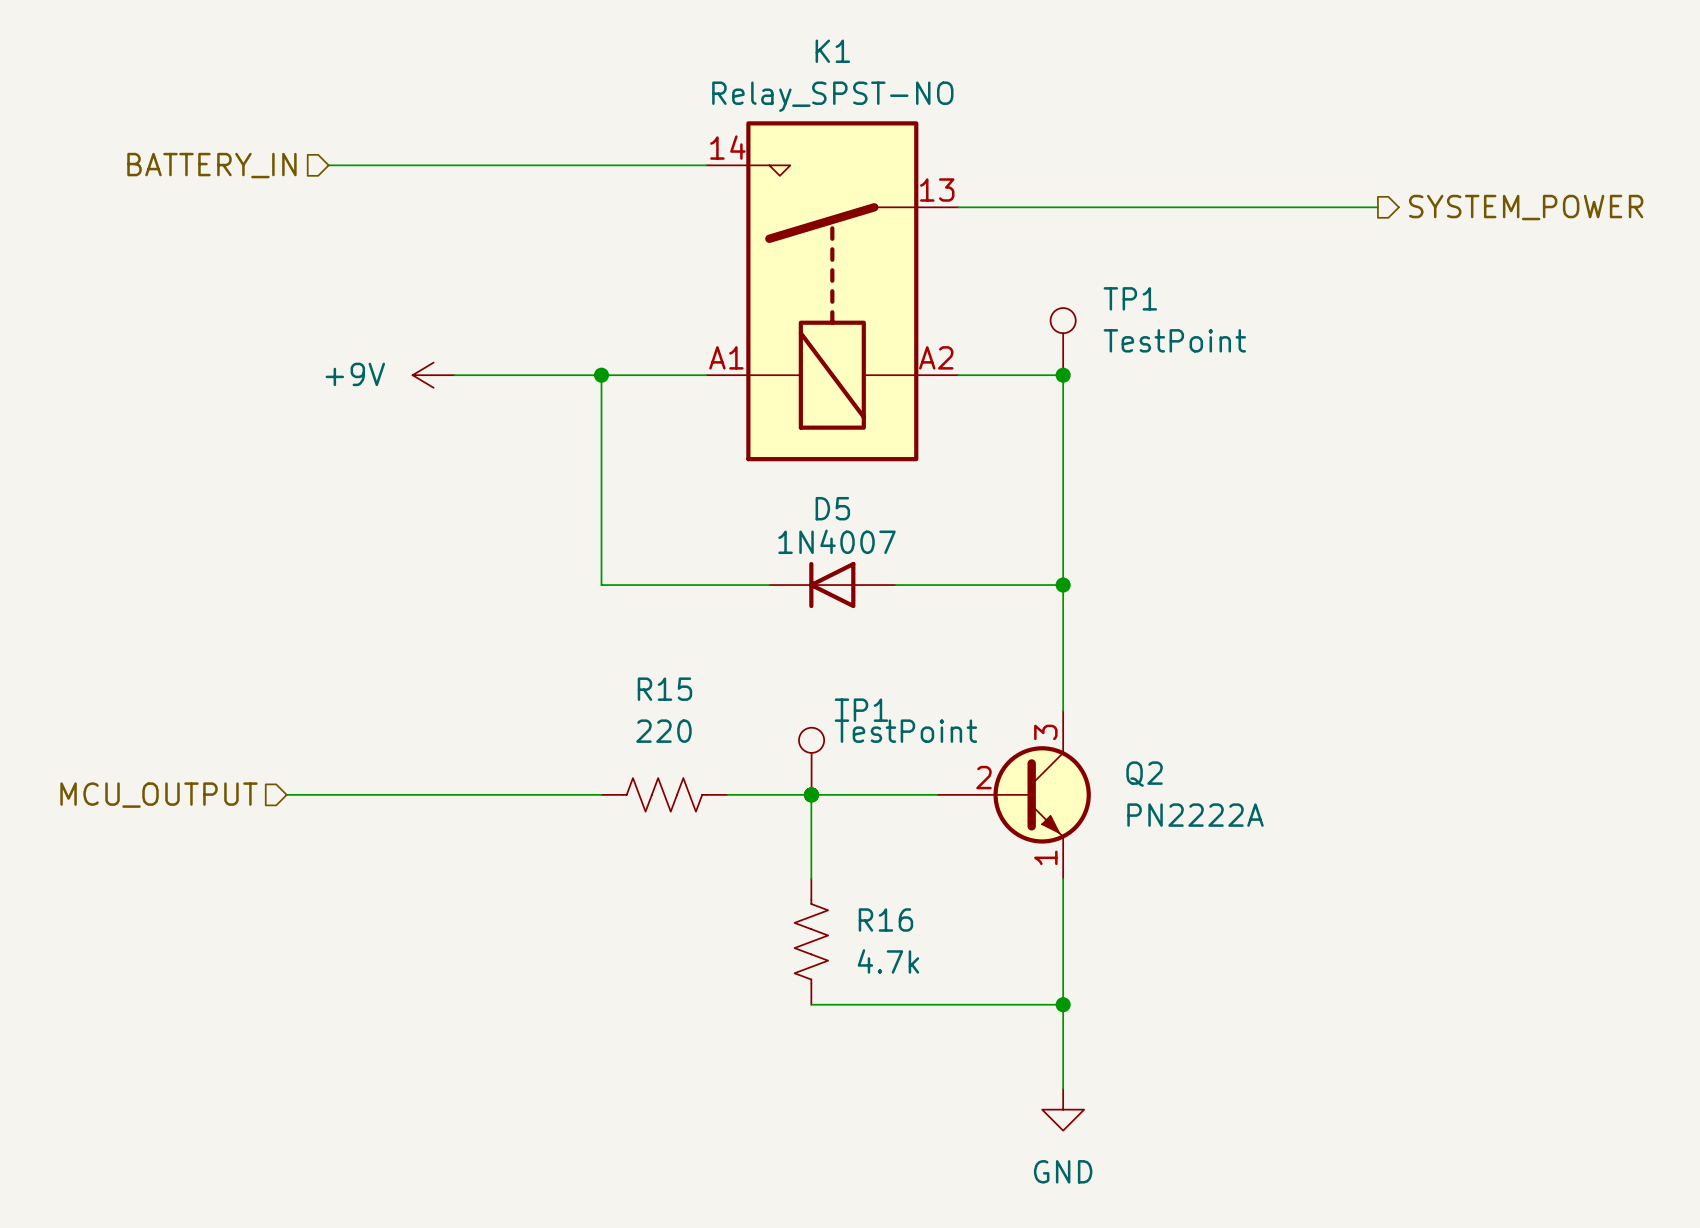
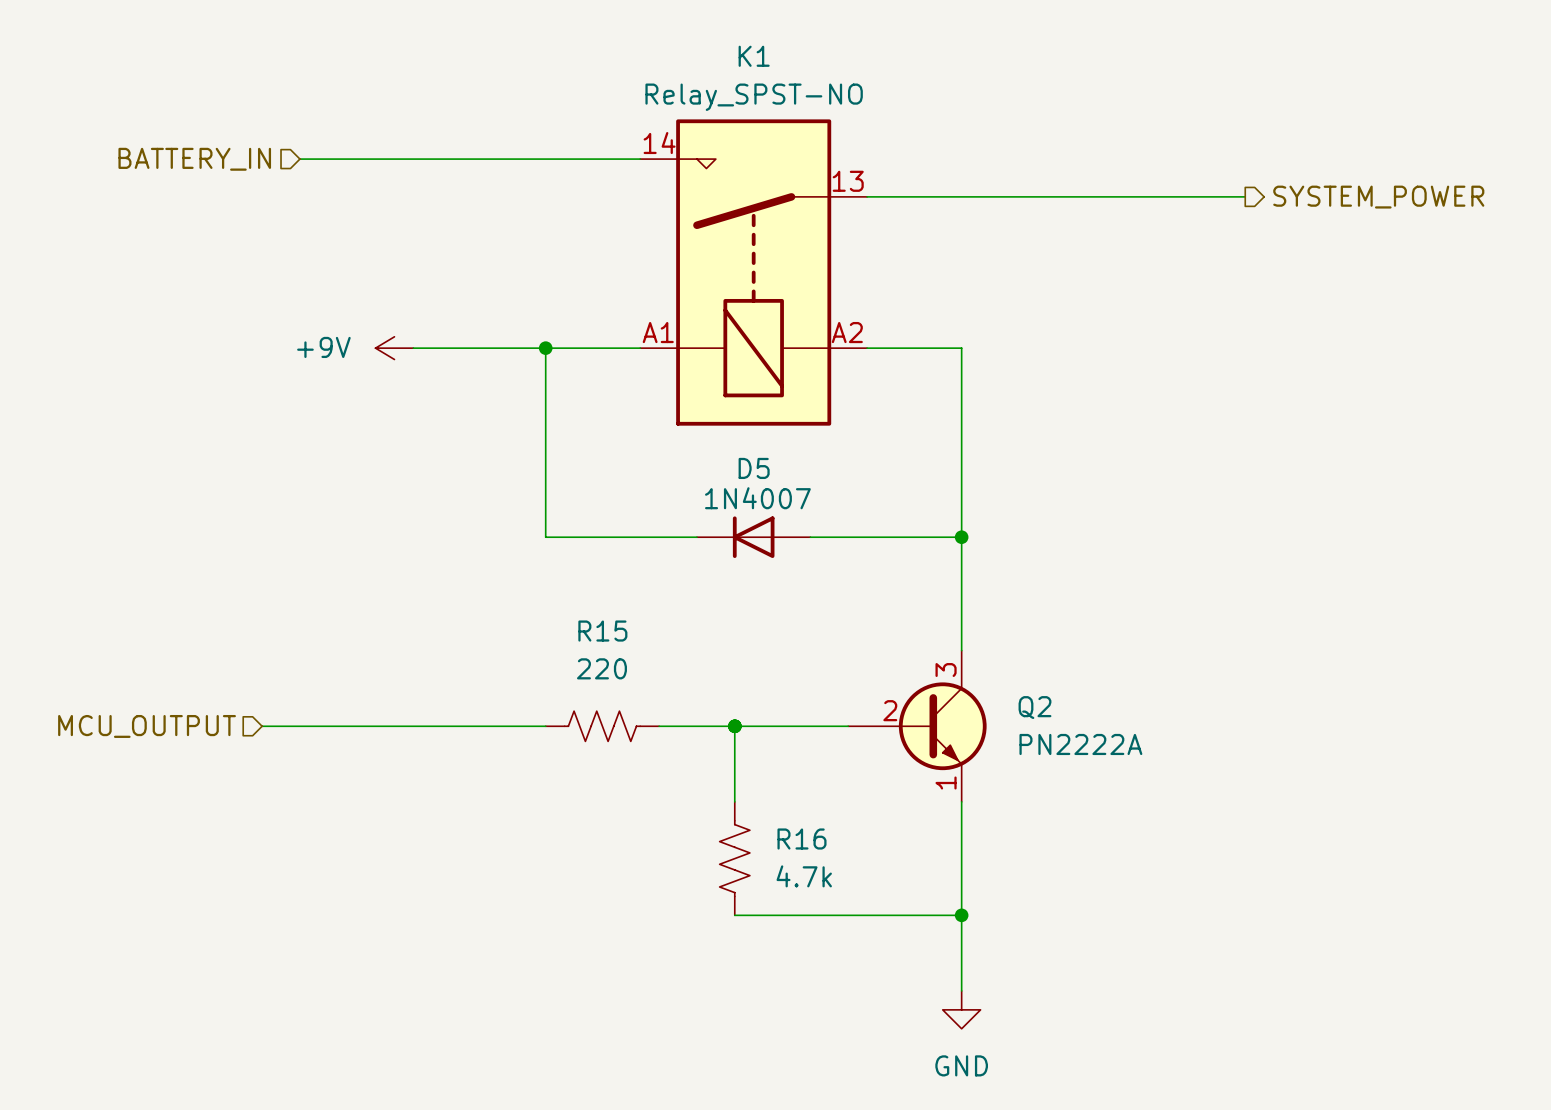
TP1: TestPoint (1063, 341) -> none
junction: (1063, 375) -> none
TP1: TestPoint (811, 761) -> none

